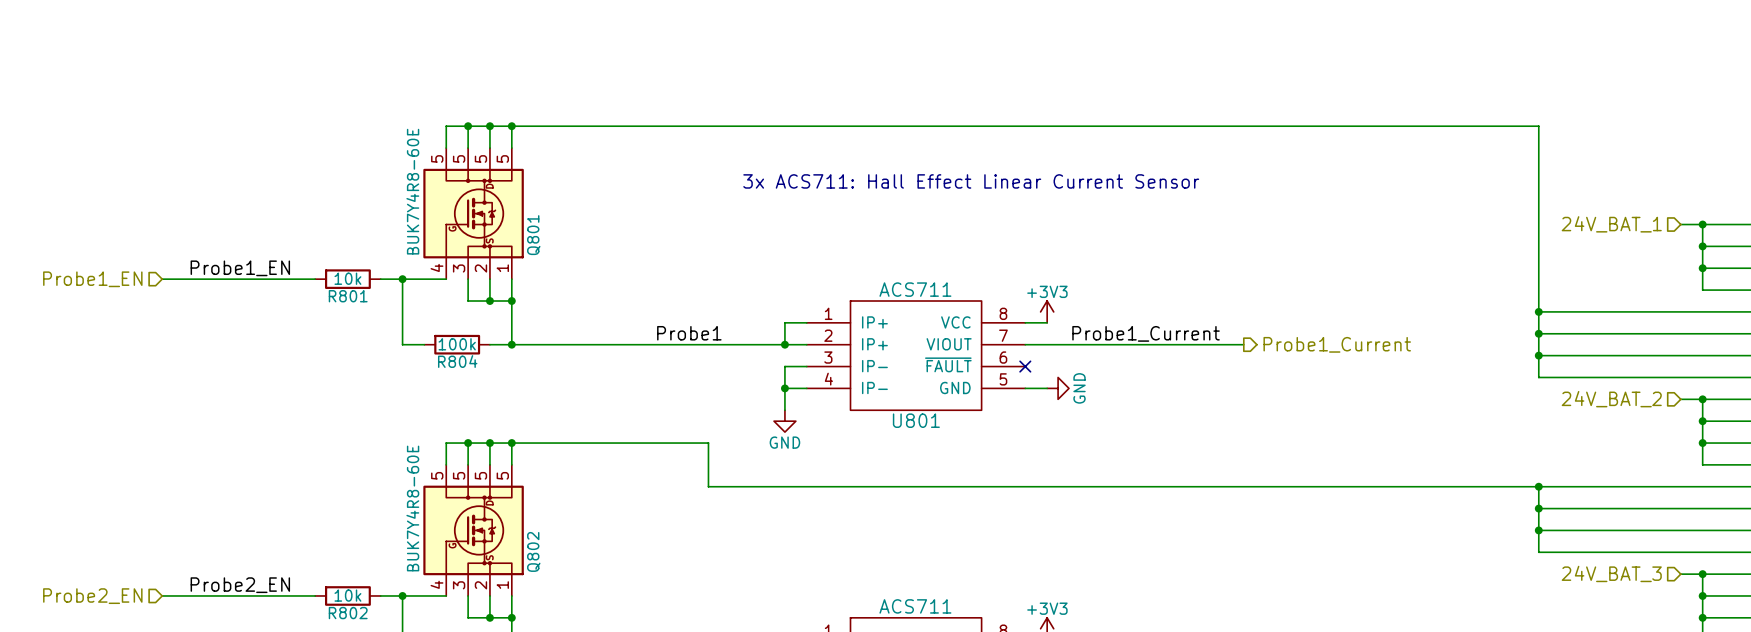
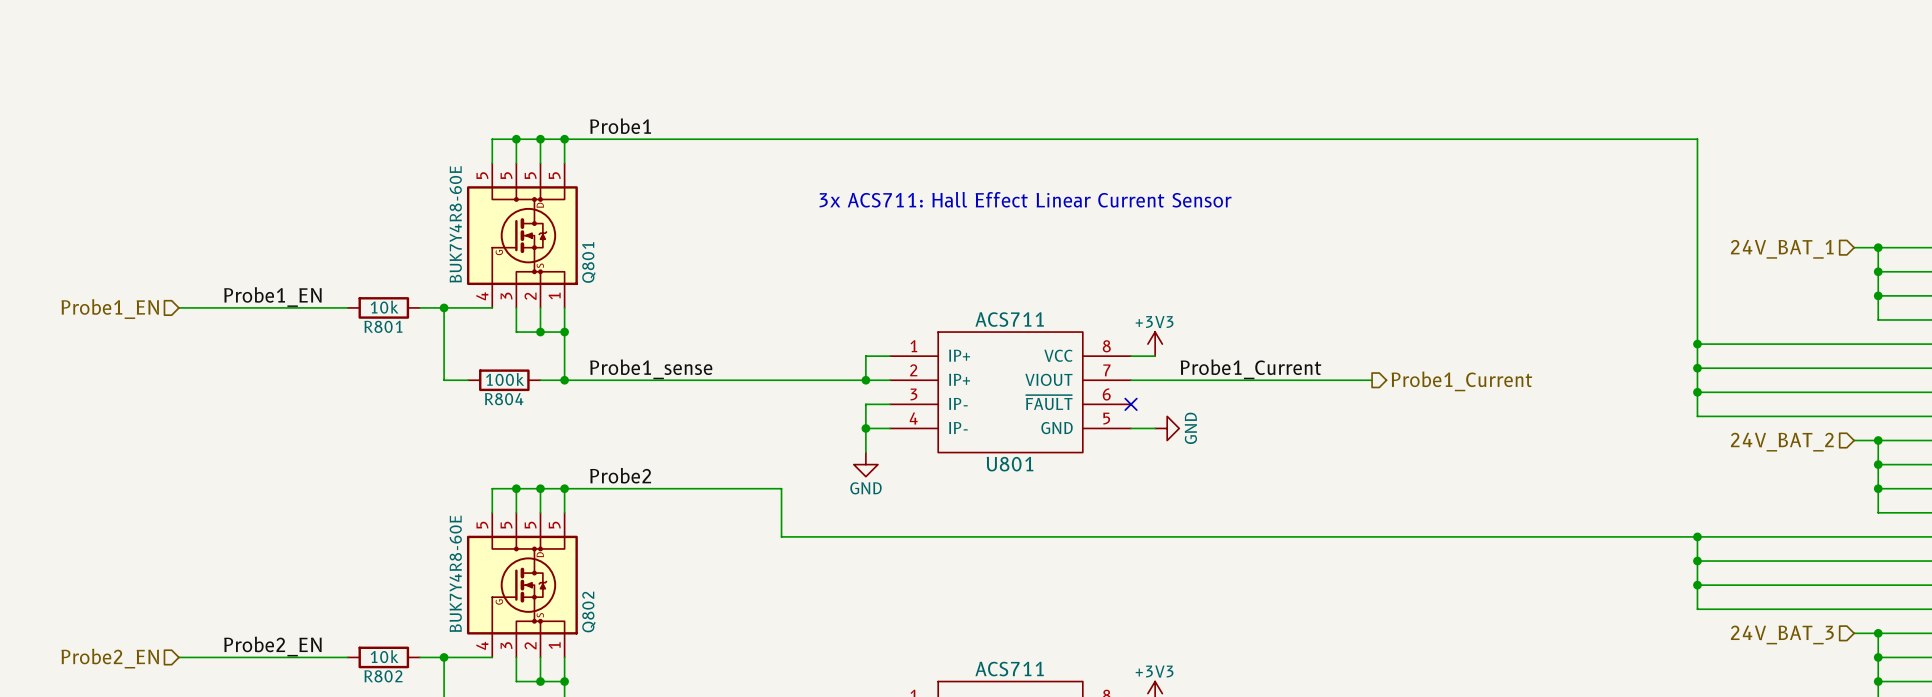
label: none -> Probe1 (620, 126)
label: Probe1 (689, 333) -> Probe1_sense (651, 369)
label: none -> Probe2 (620, 475)

